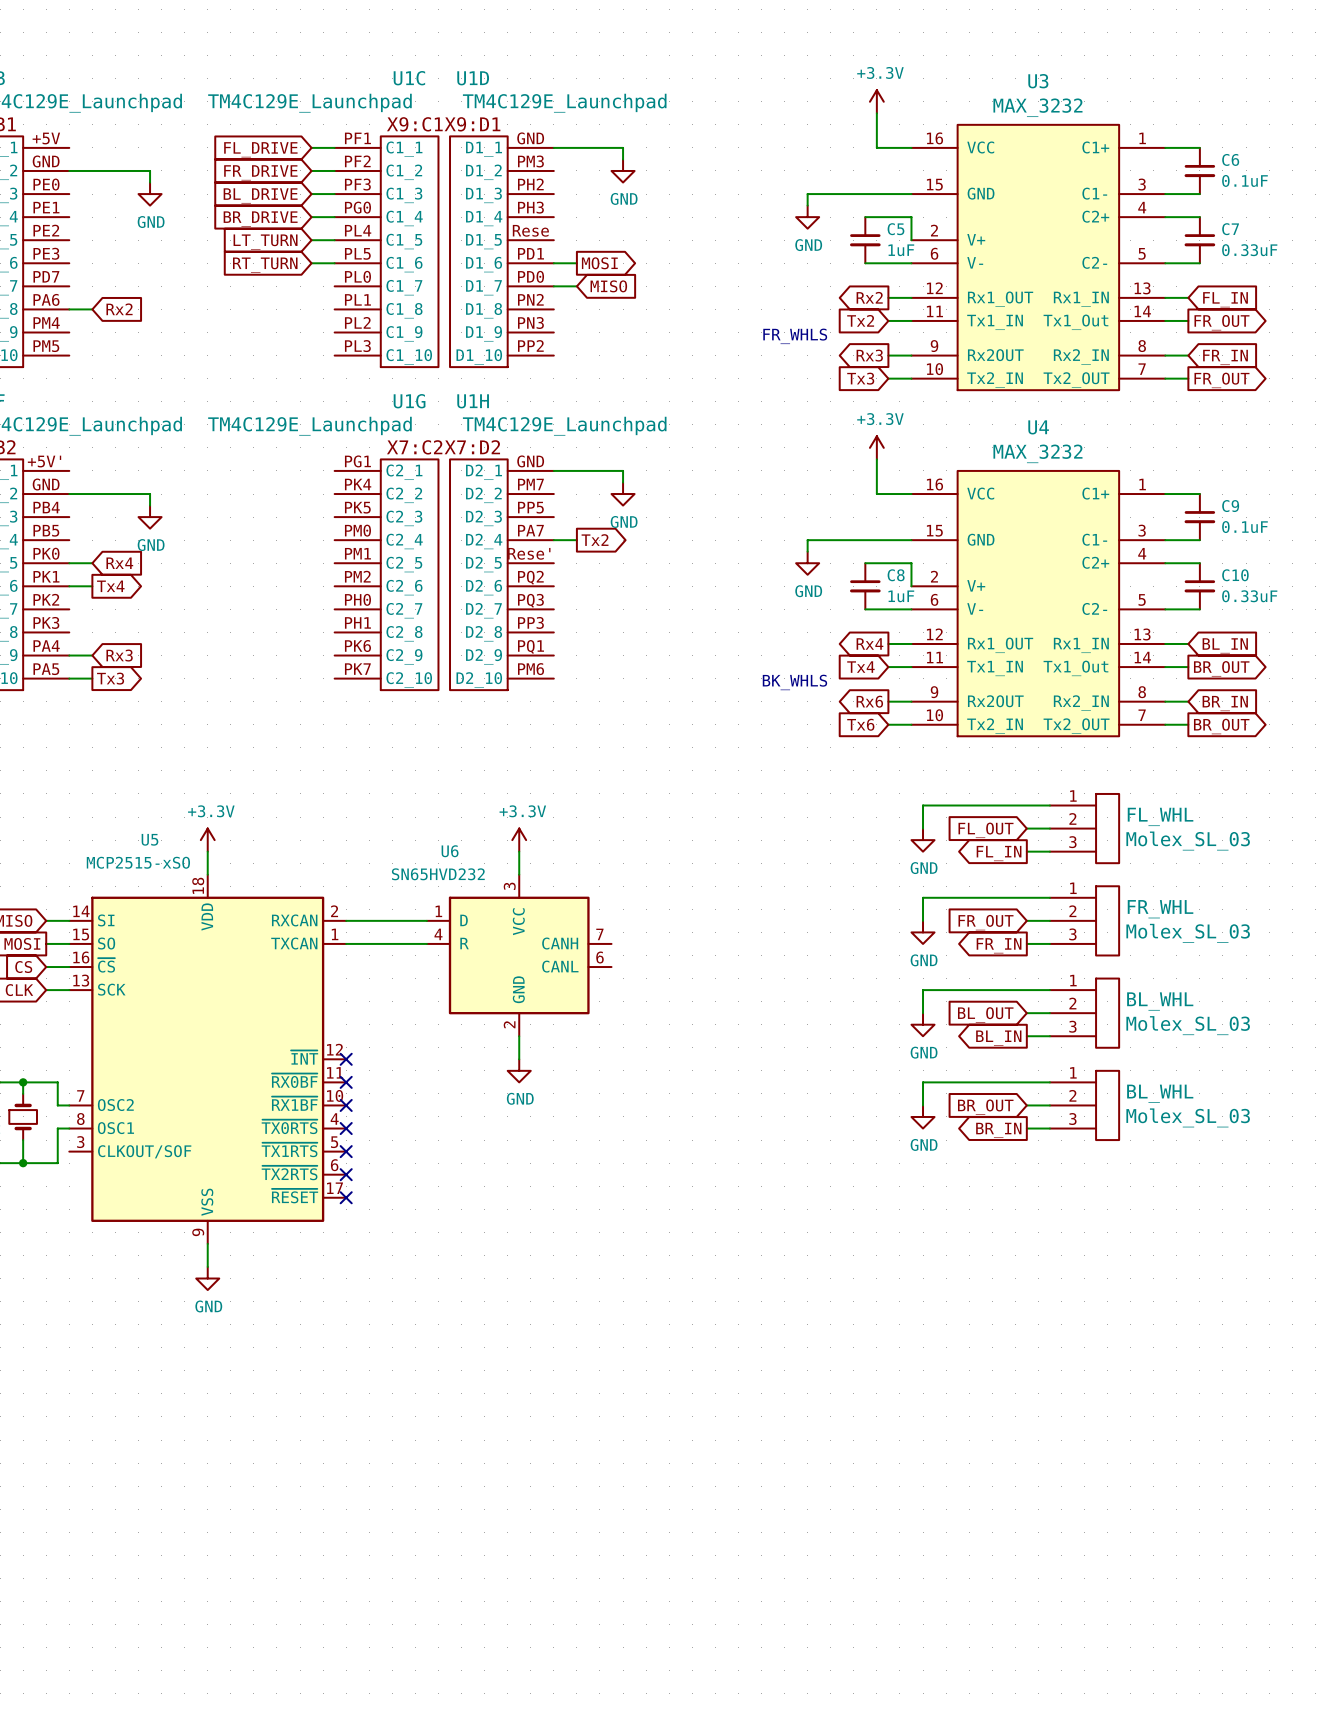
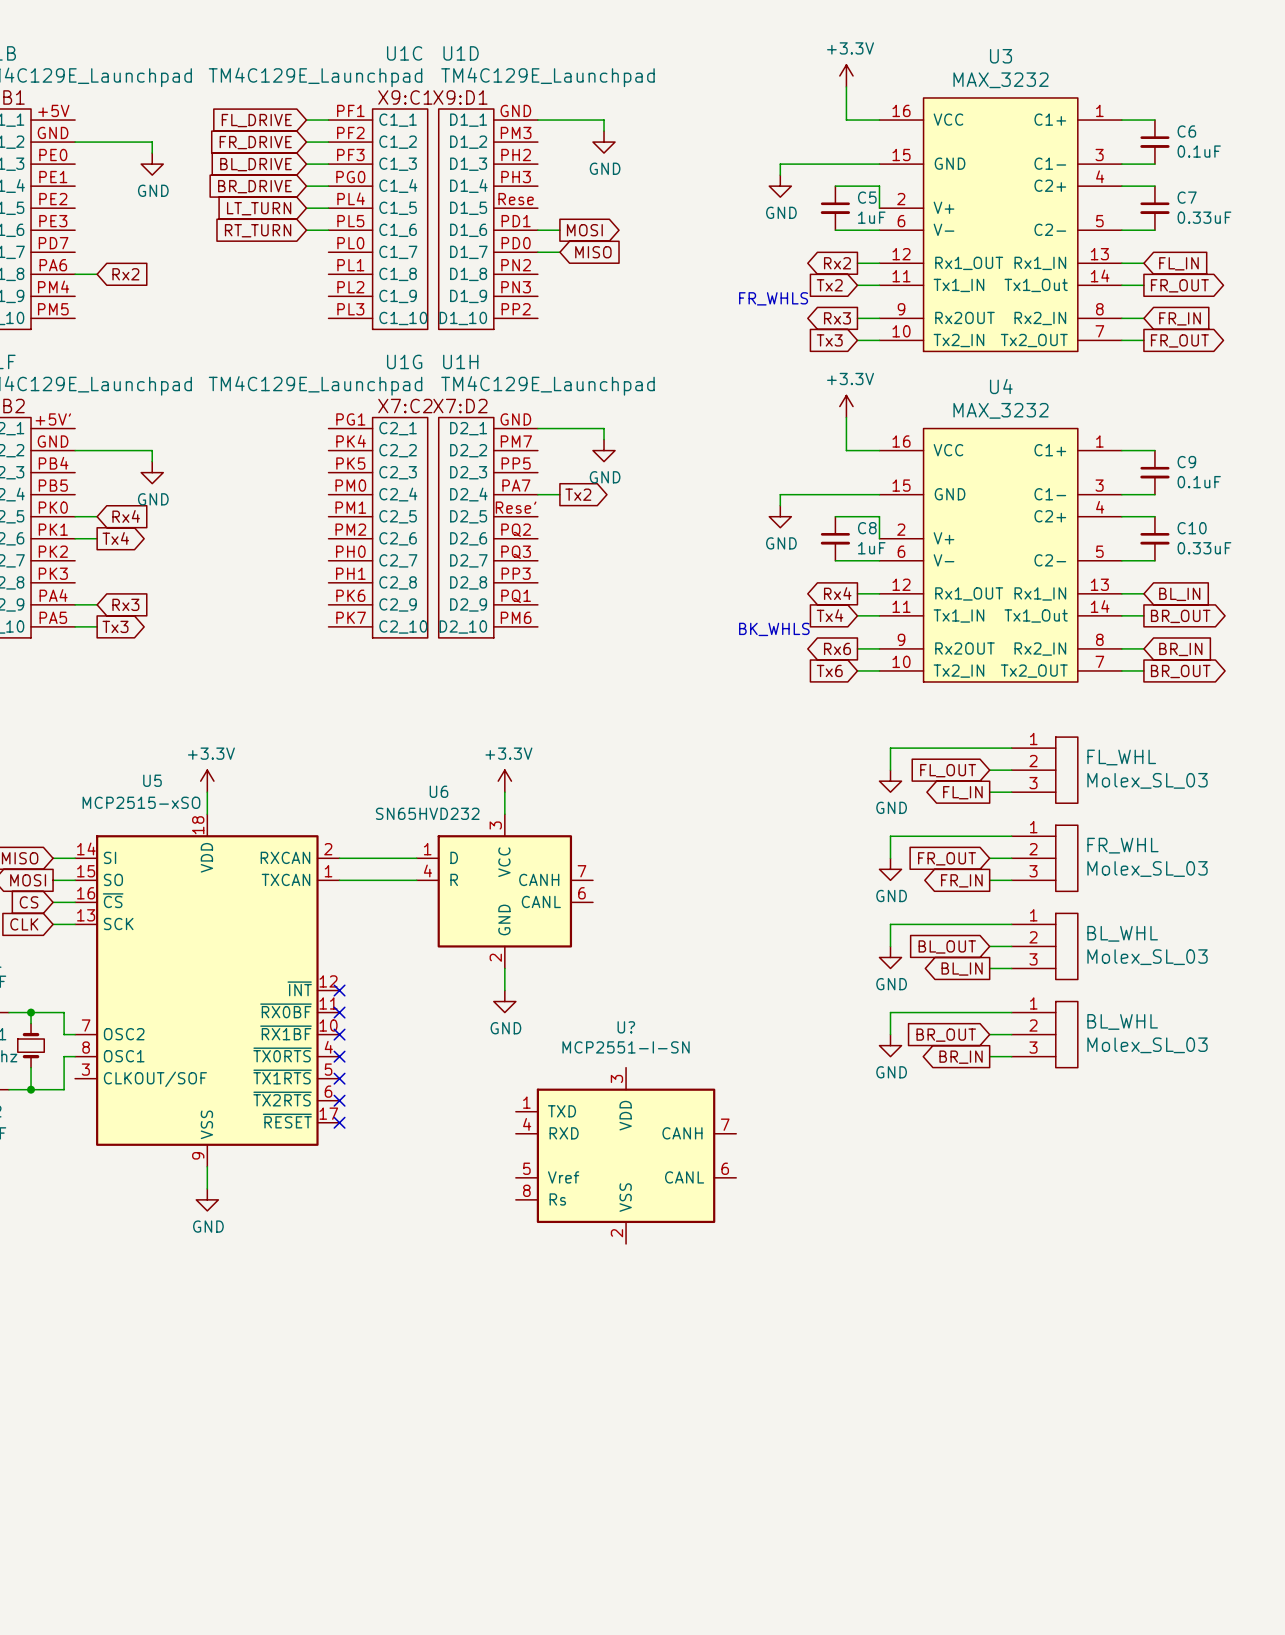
U?: none -> MCP2551-I-SN (626, 1155)

